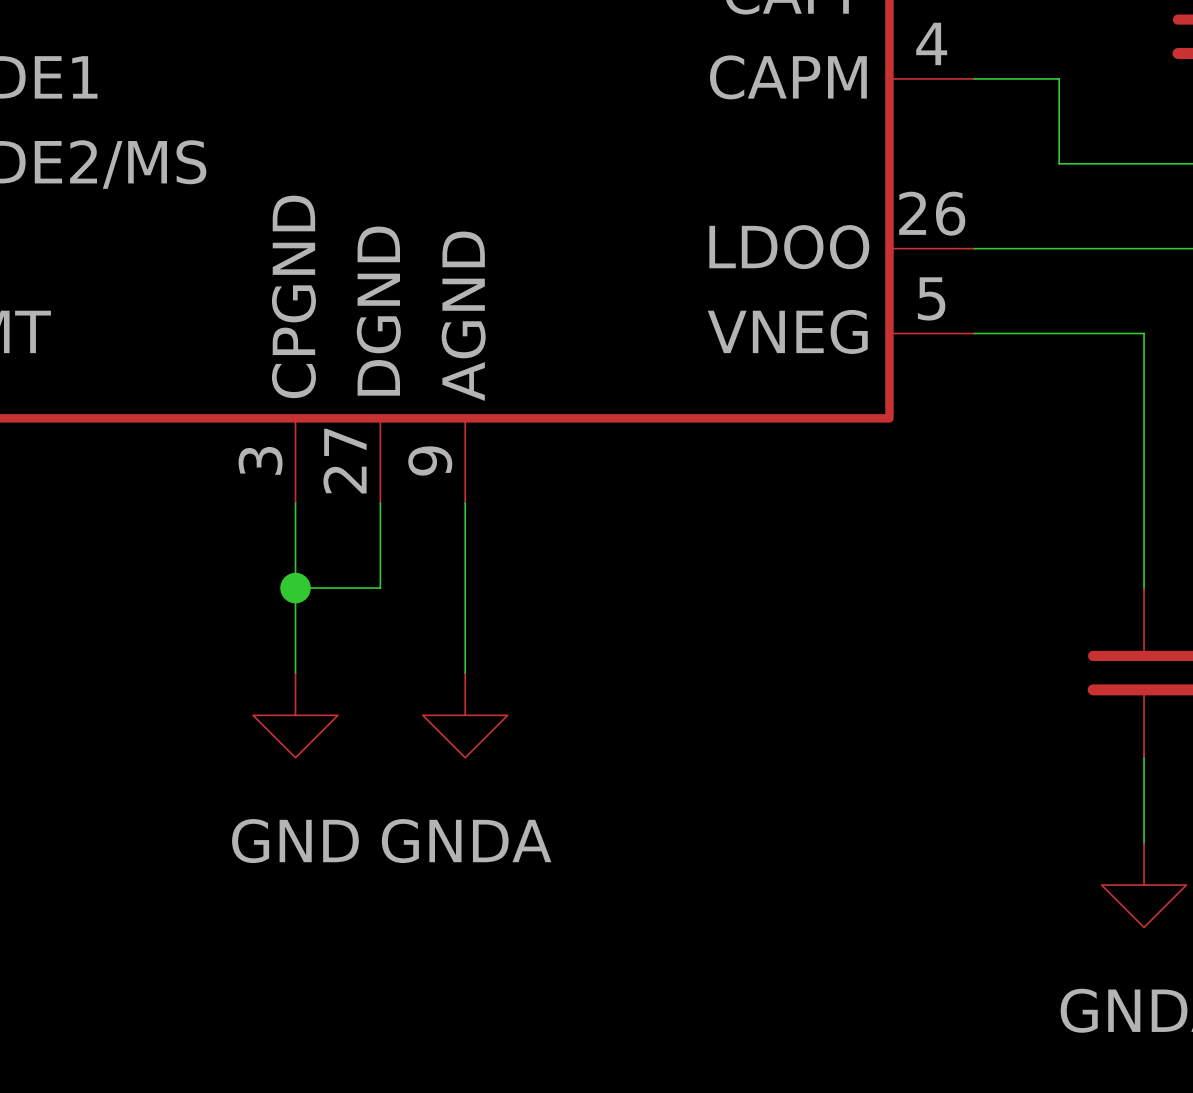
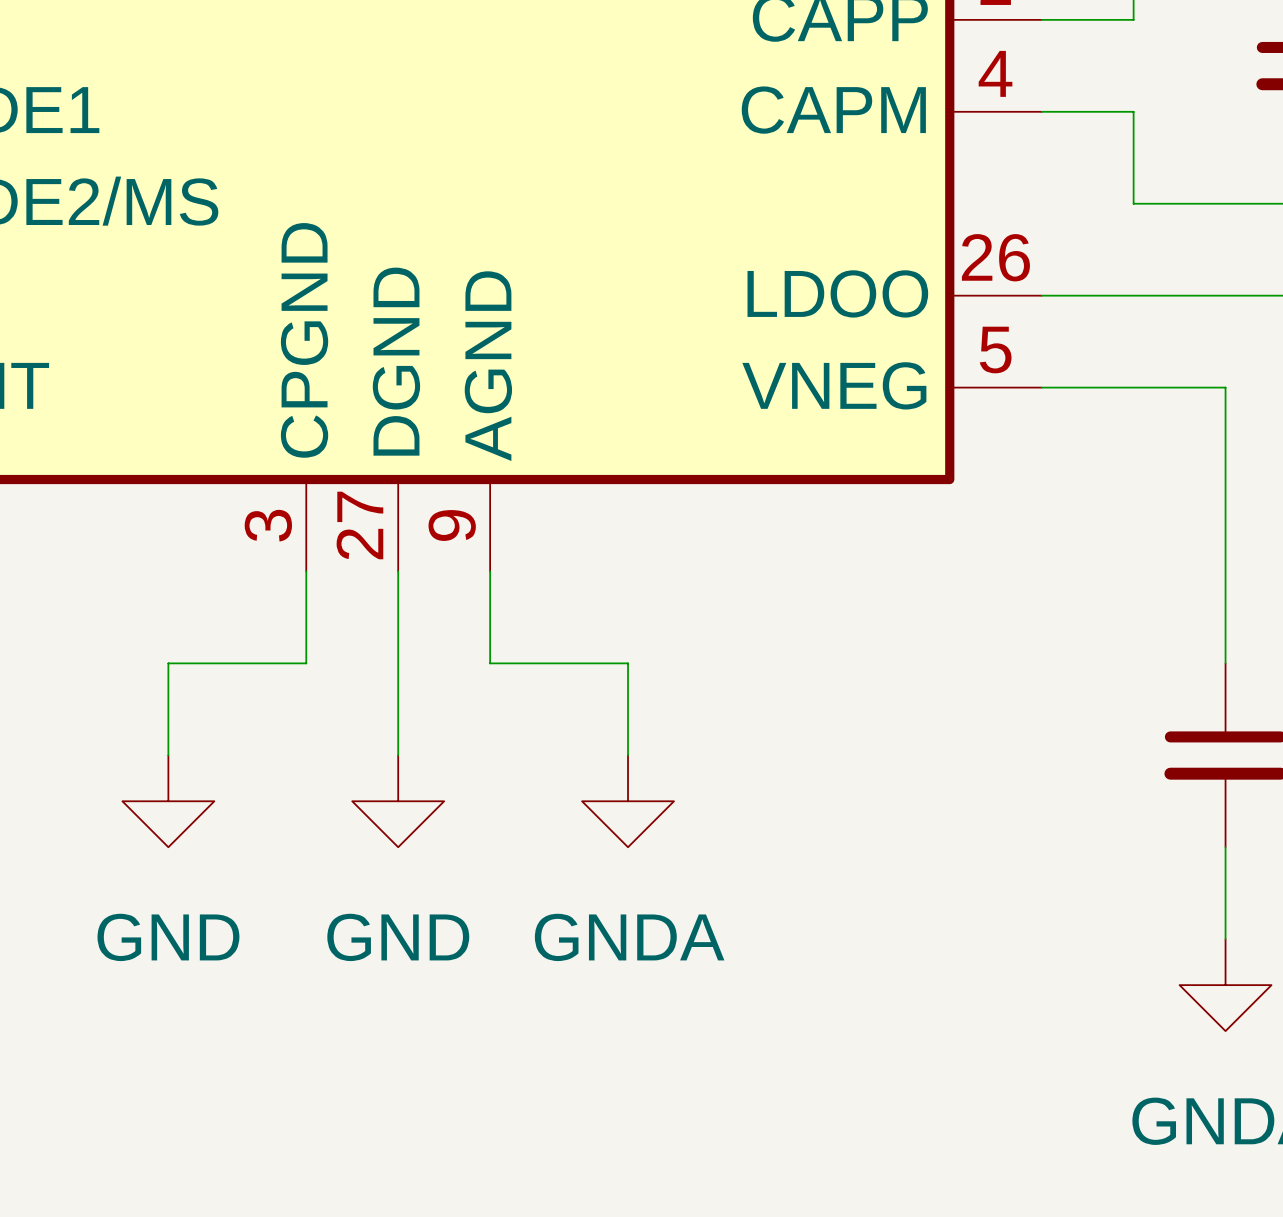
wire: none -> (306, 663) (168, 663) (168, 755)
junction: (295, 588) -> none
wire: (380, 588) (295, 588) (295, 672) -> (398, 663) (398, 755)
wire: (465, 588) (465, 672) -> (490, 663) (628, 663) (628, 755)
power symbol: none -> GND (168, 801)
power symbol: GND (295, 715) -> none
power symbol: none -> GND (398, 801)
power symbol position: GNDA (465, 715) -> GNDA (628, 801)

